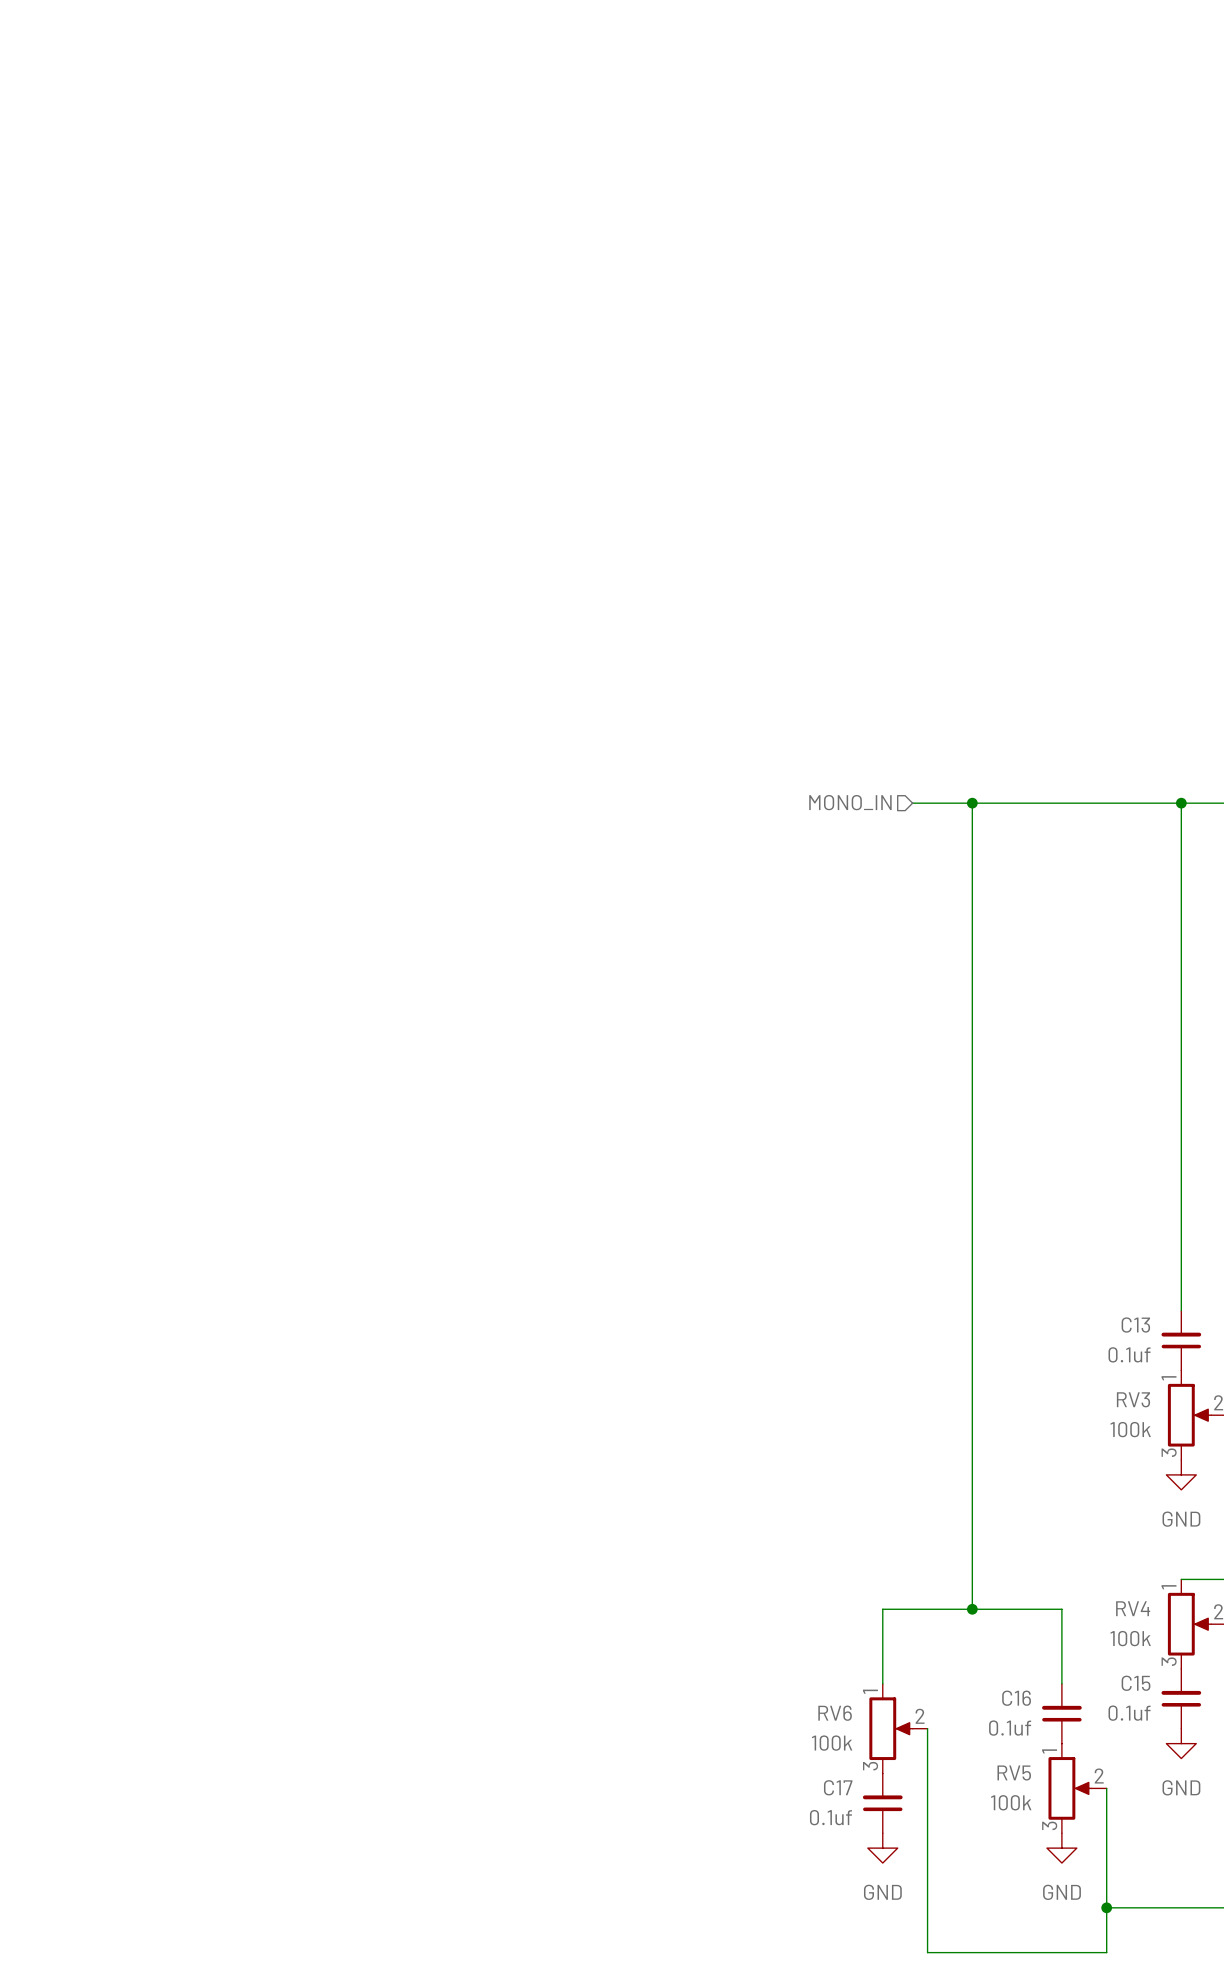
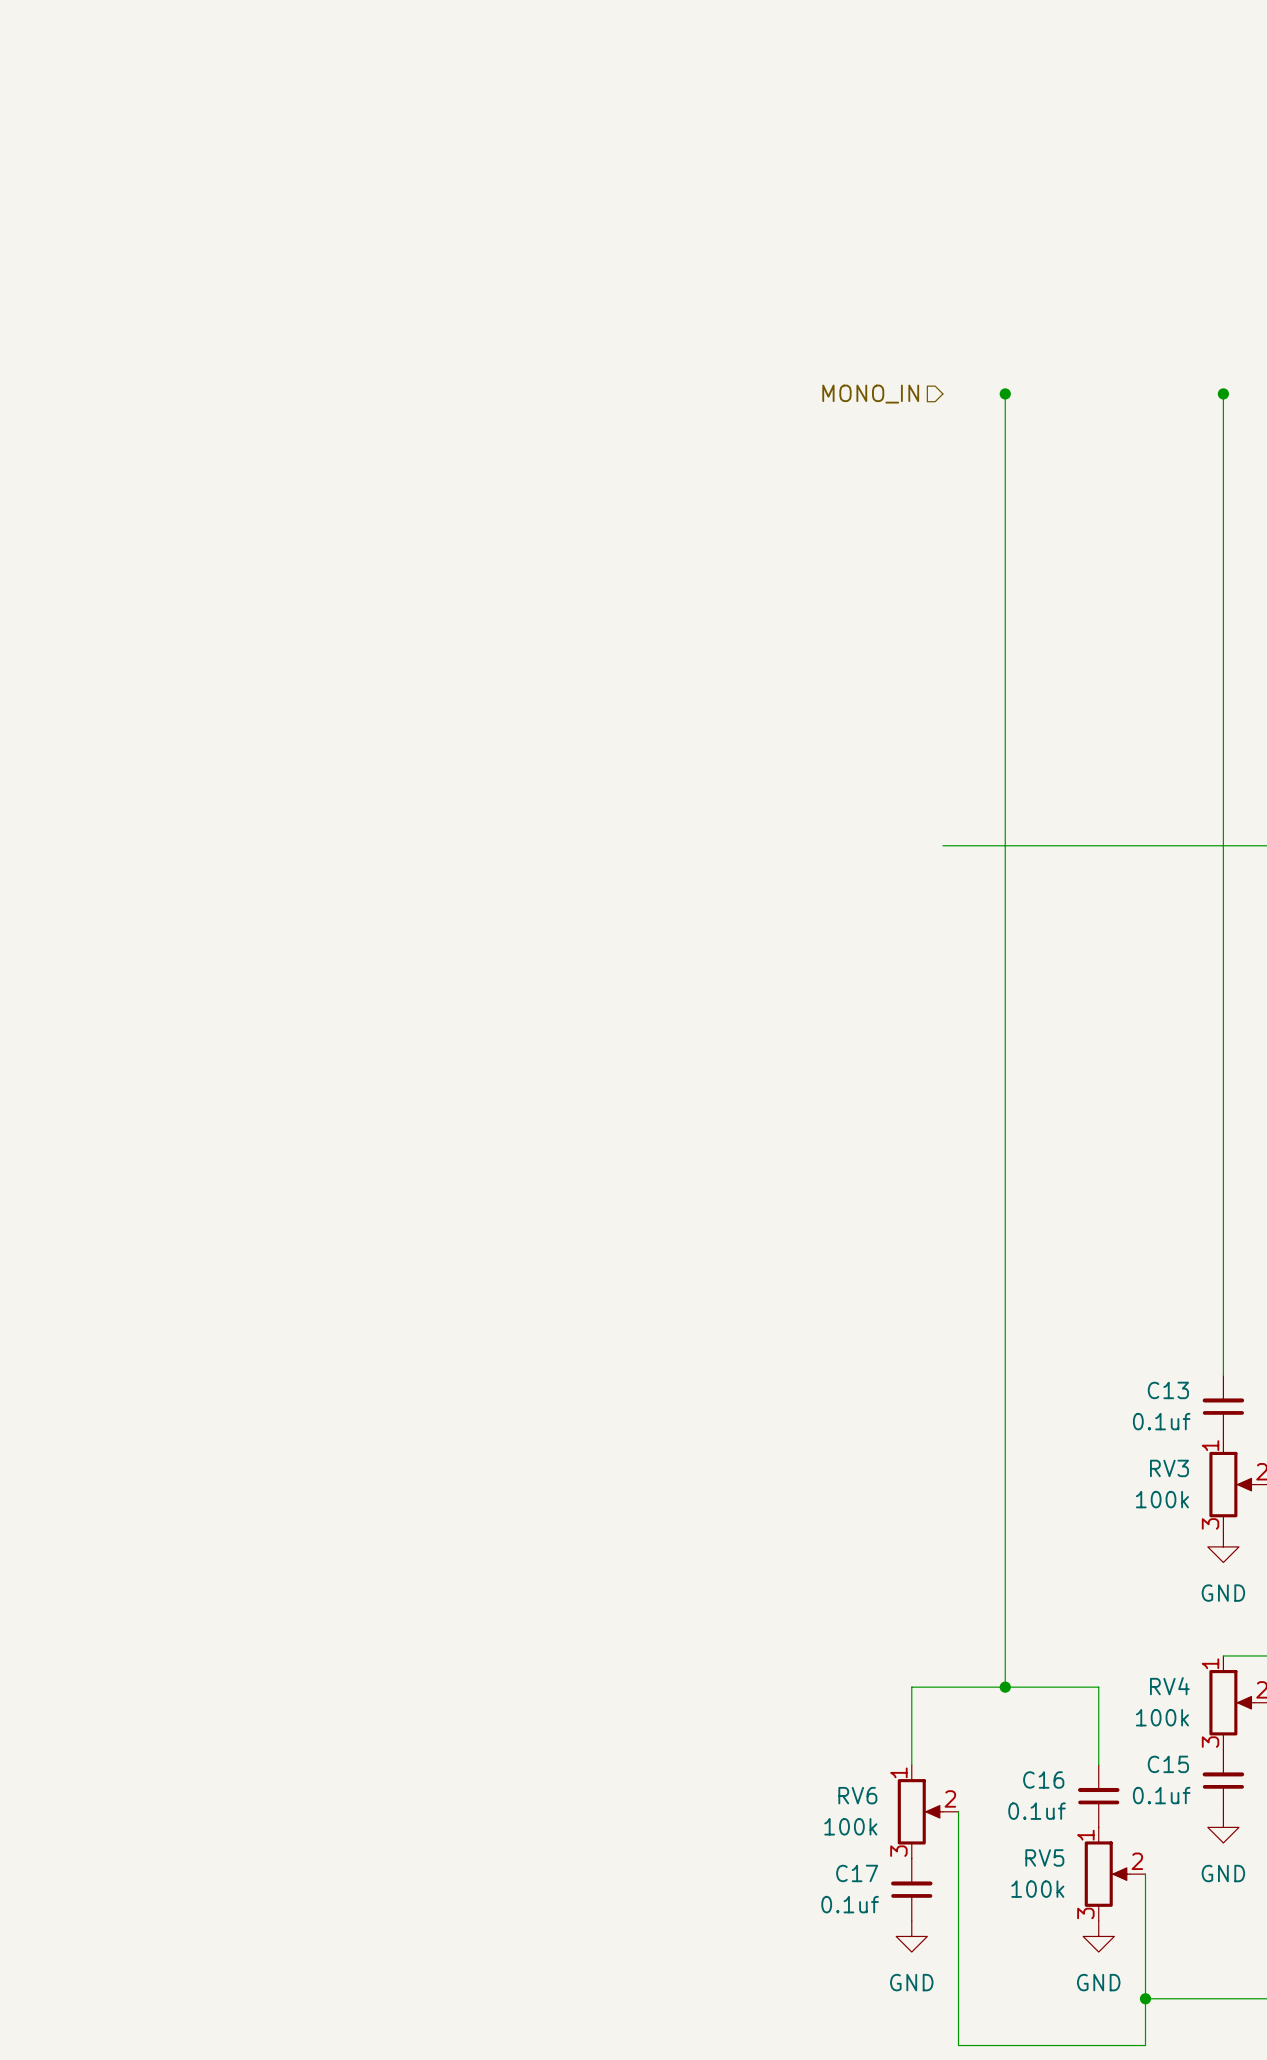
hierarchical label: none -> MONO_IN (870, 394)
wire: none -> (1005, 393) (1005, 845)
junction: none -> (1005, 393)
wire: none -> (1223, 393) (1223, 845)
junction: none -> (1223, 393)
hierarchical label: MONO_IN (850, 802) -> none
junction: (972, 803) -> none
junction: (1181, 803) -> none

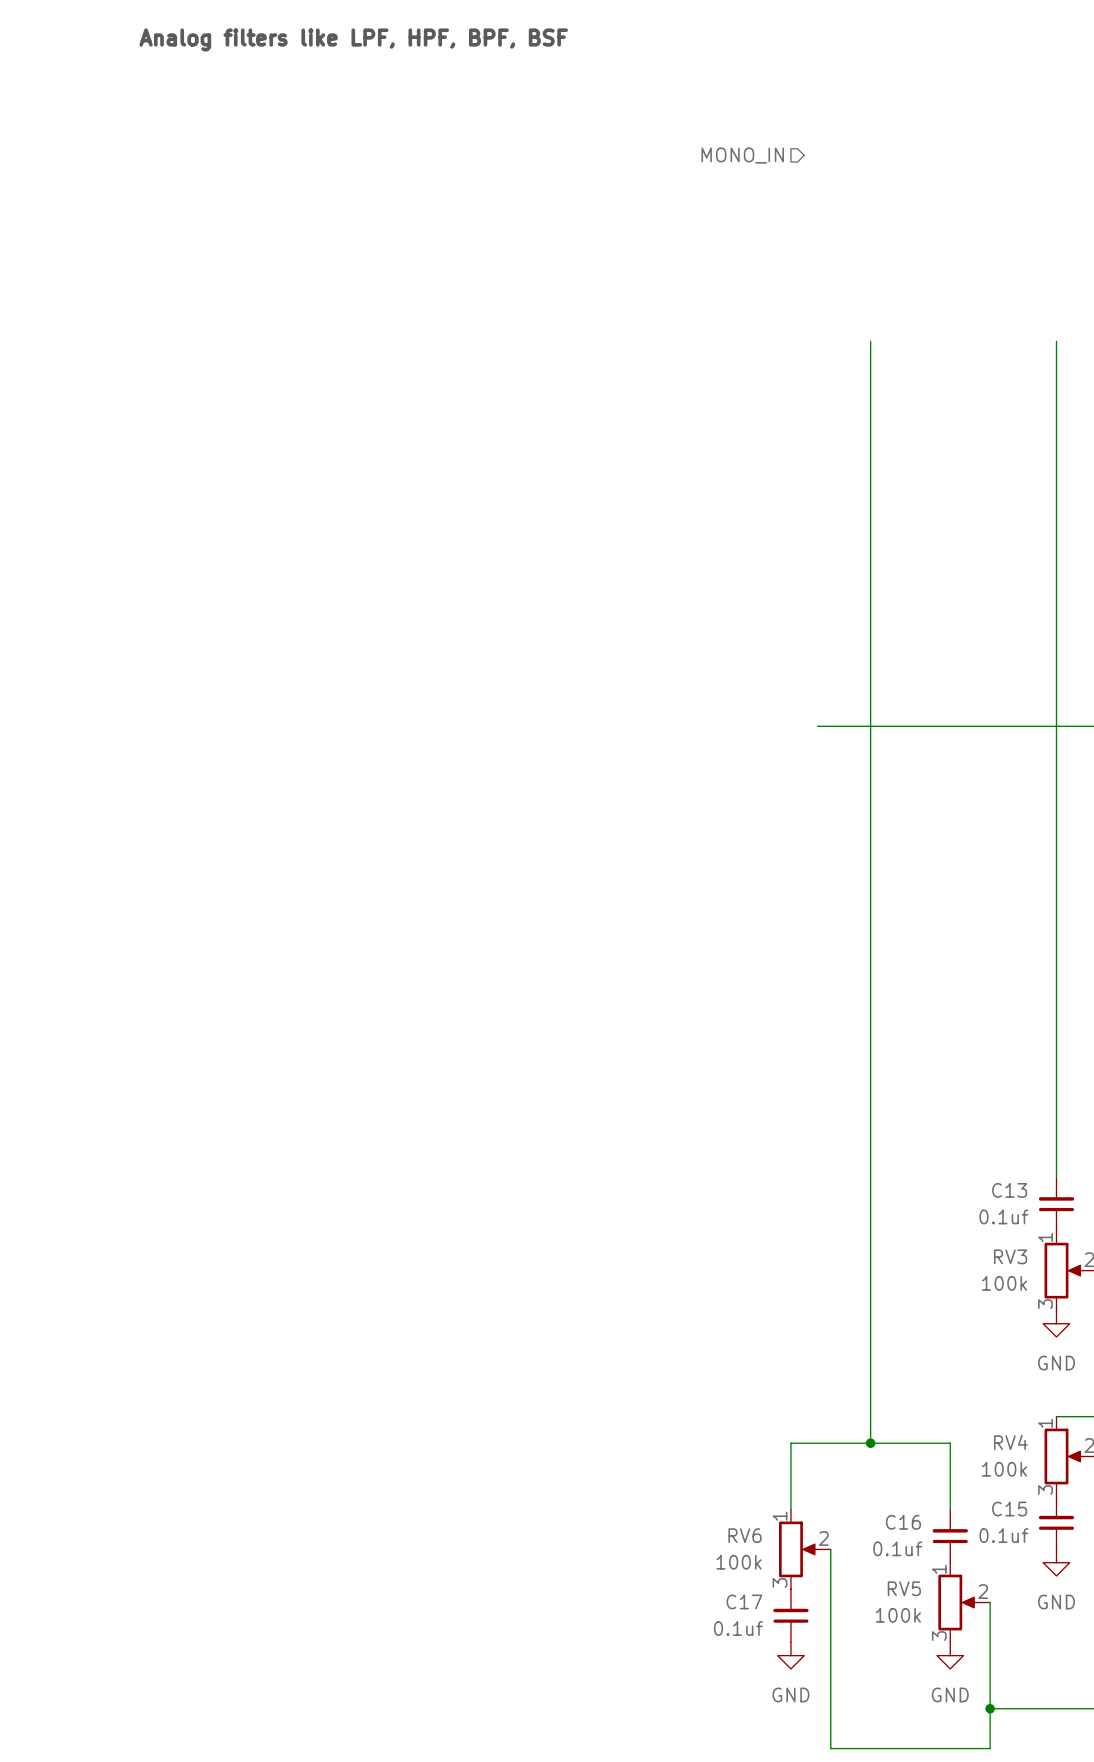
text: none -> Analog filters like LPF, HPF, BPF, BSF (353, 39)
junction: (1005, 393) -> none
junction: (1223, 393) -> none
hierarchical label position: MONO_IN (870, 394) -> MONO_IN (742, 155)

